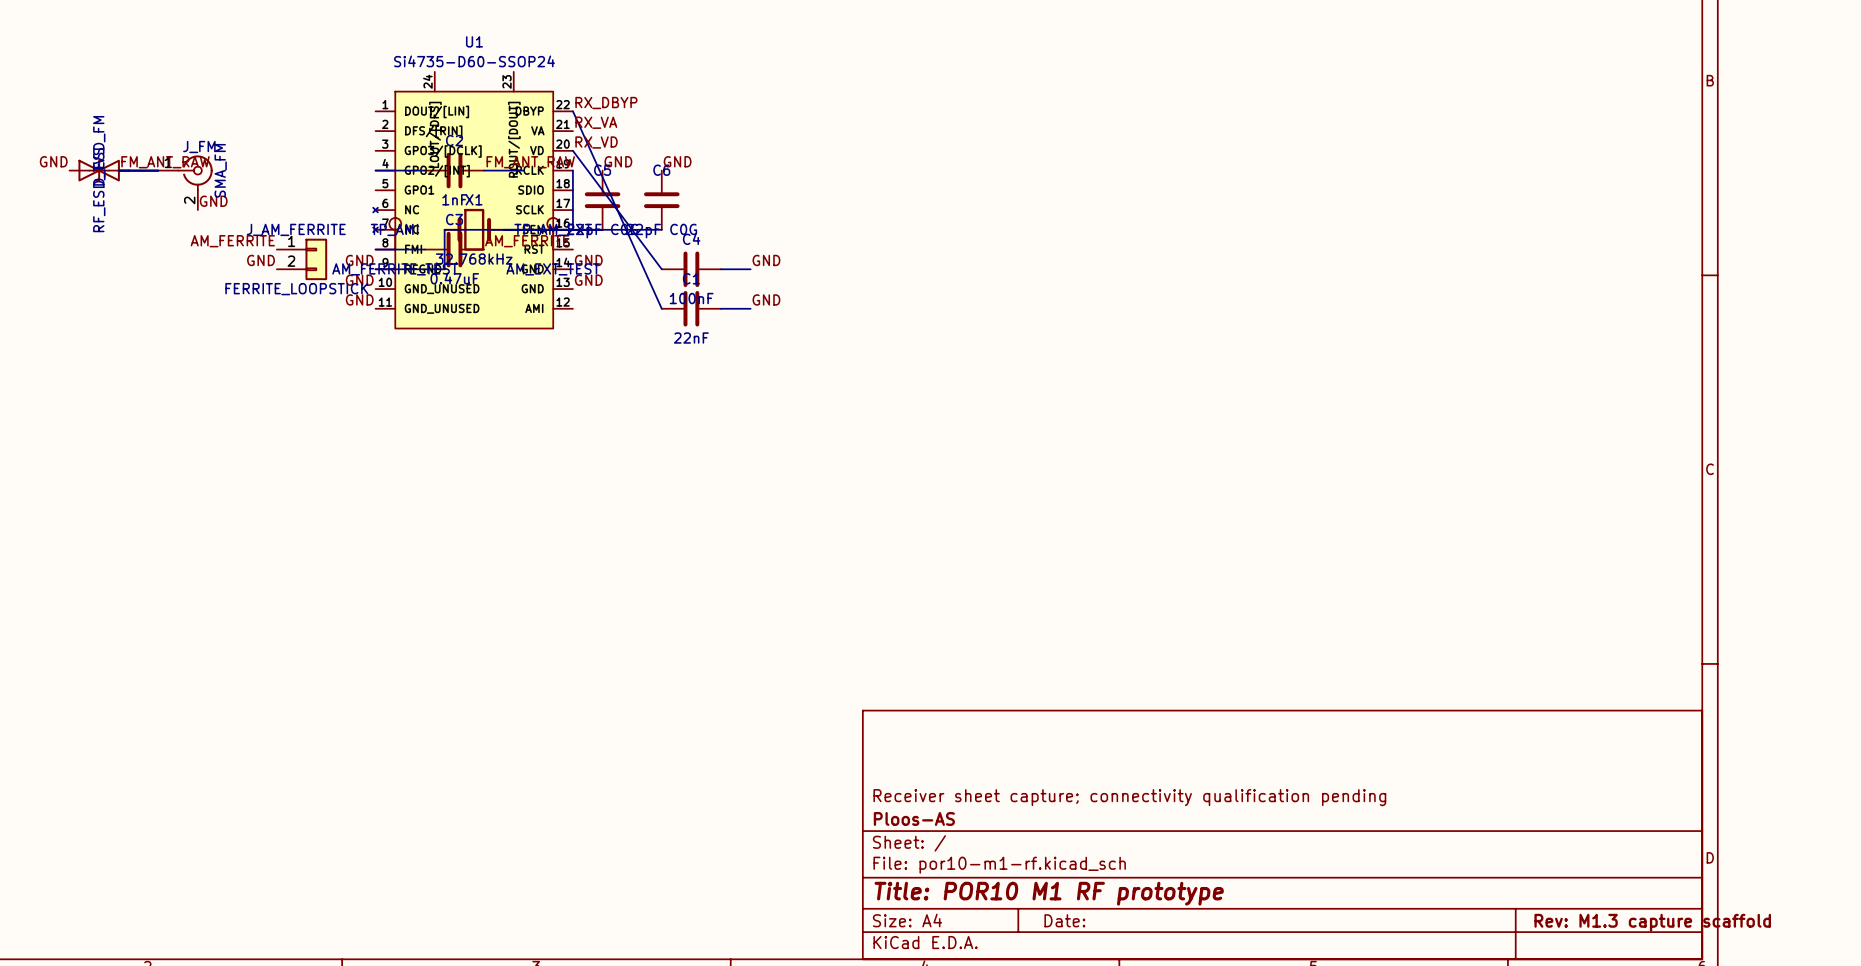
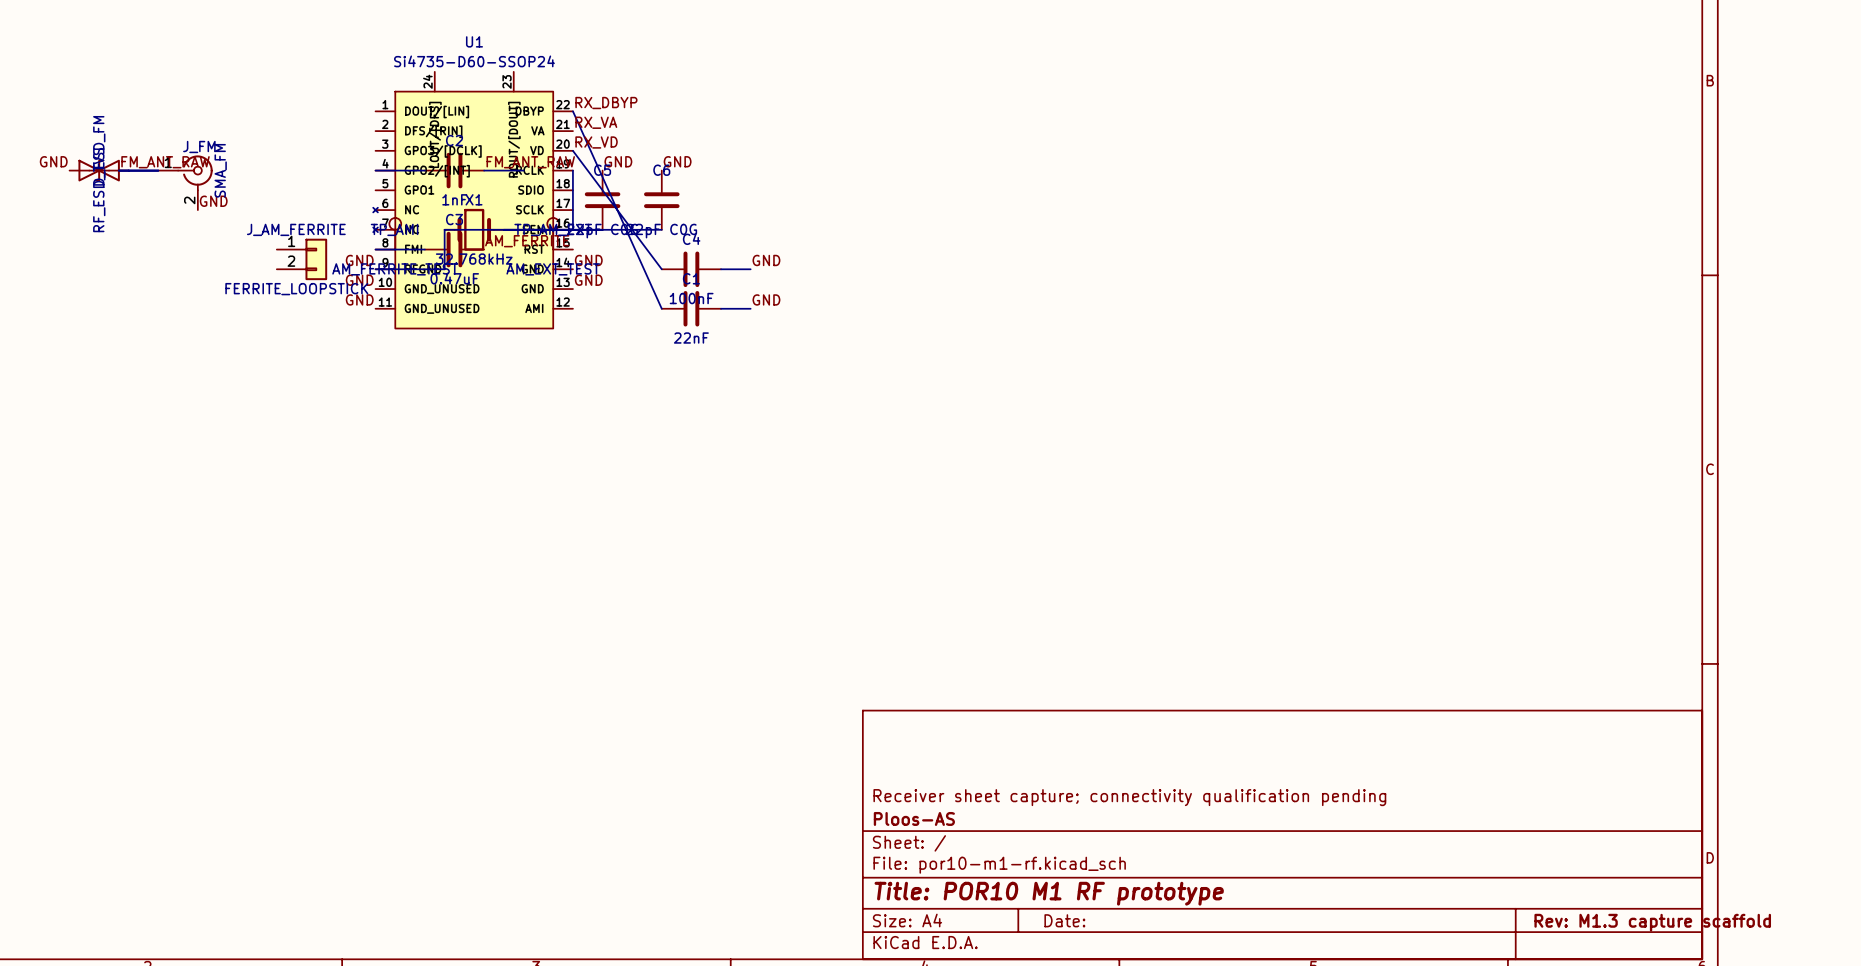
label: AM_FERRITE (232, 241) -> none
label: GND (261, 260) -> none

